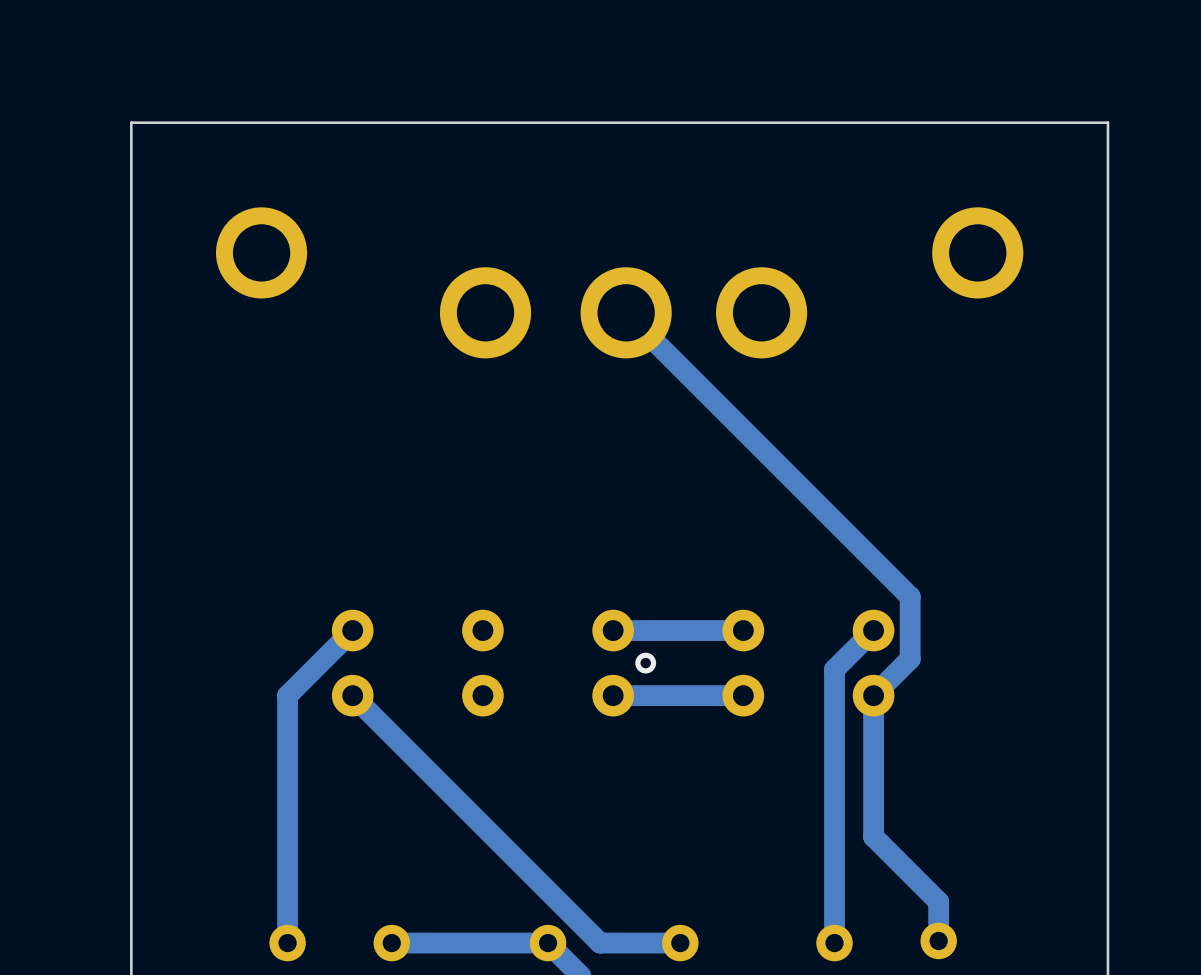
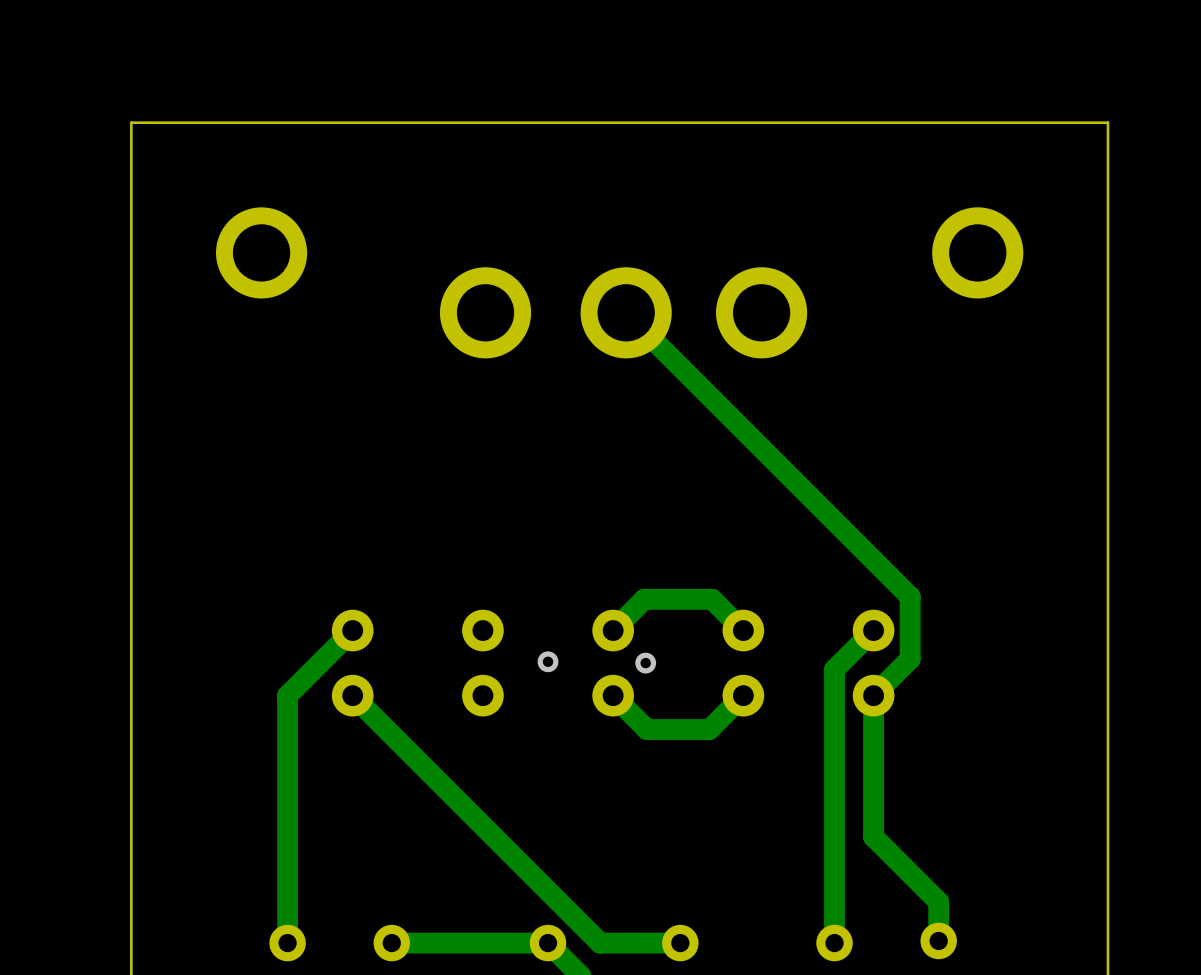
track: (743, 630) (613, 630) -> (743, 630) (712, 599) (644, 599) (613, 630)
via: none -> (548, 661)
track: (743, 695) (613, 695) -> (743, 695) (709, 729) (647, 729) (613, 695)

